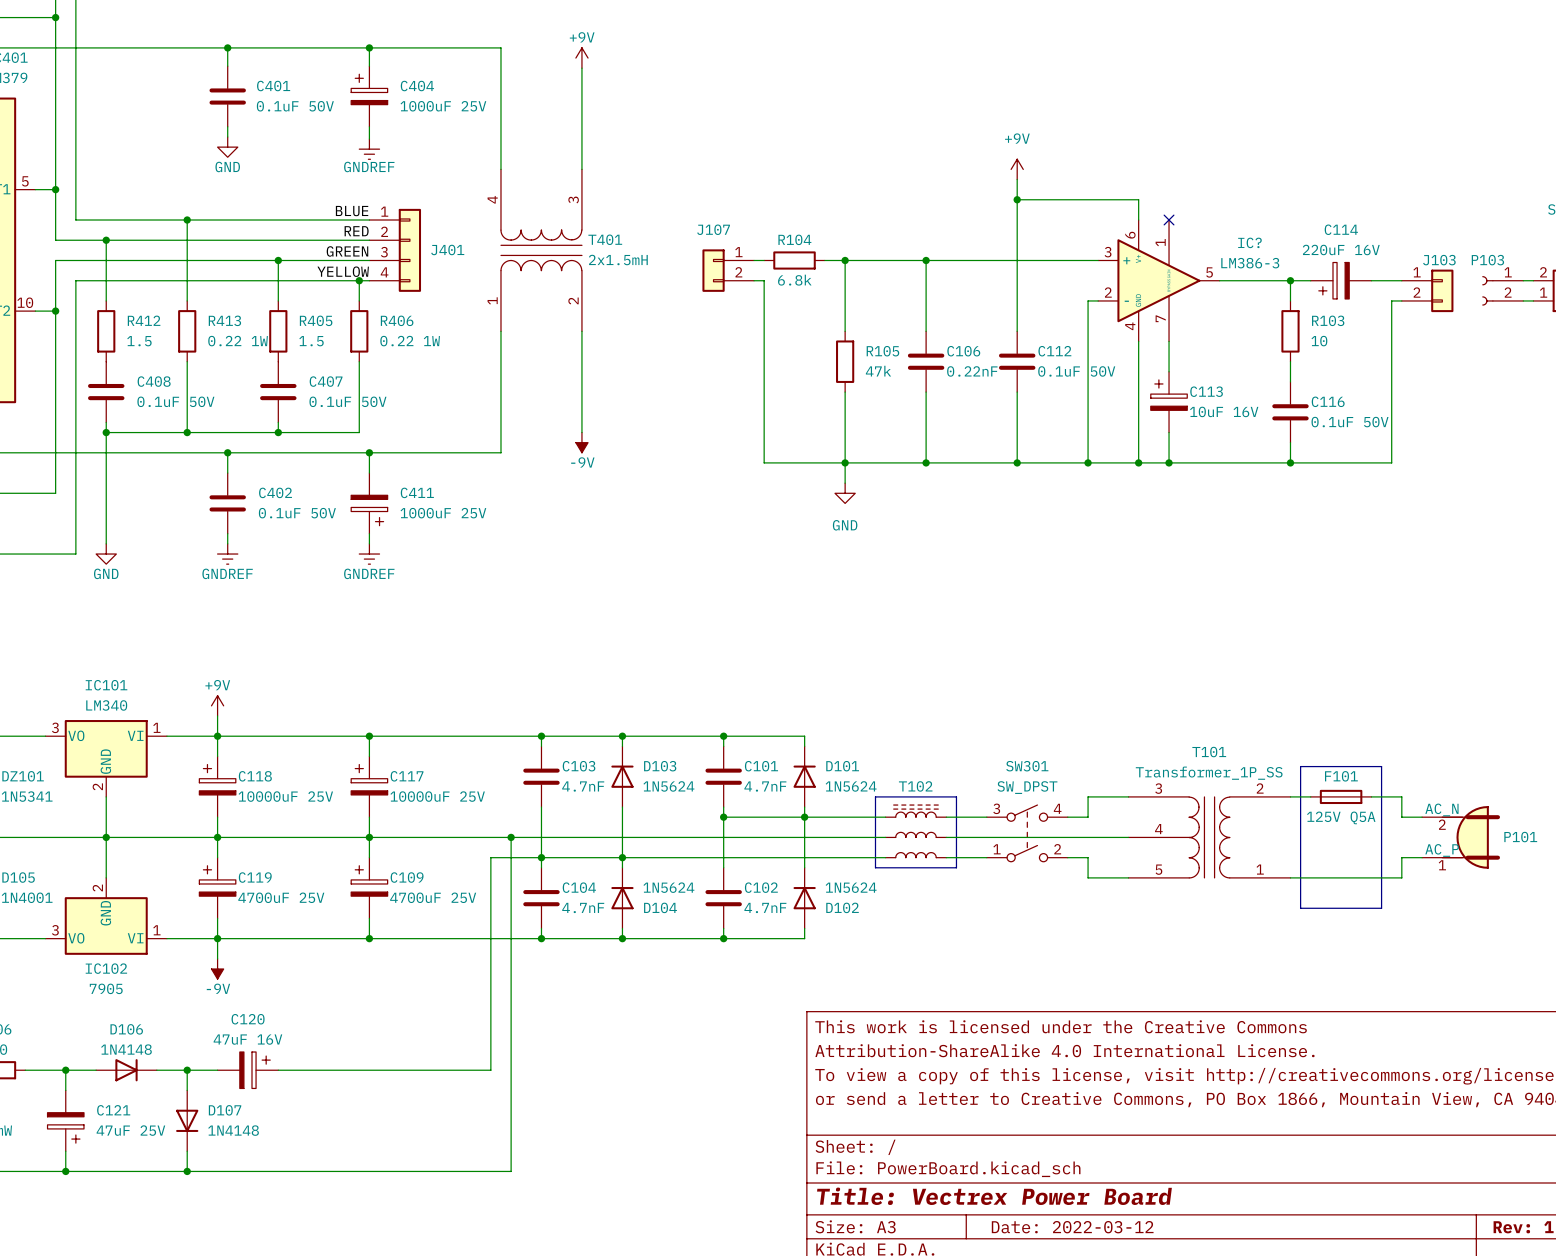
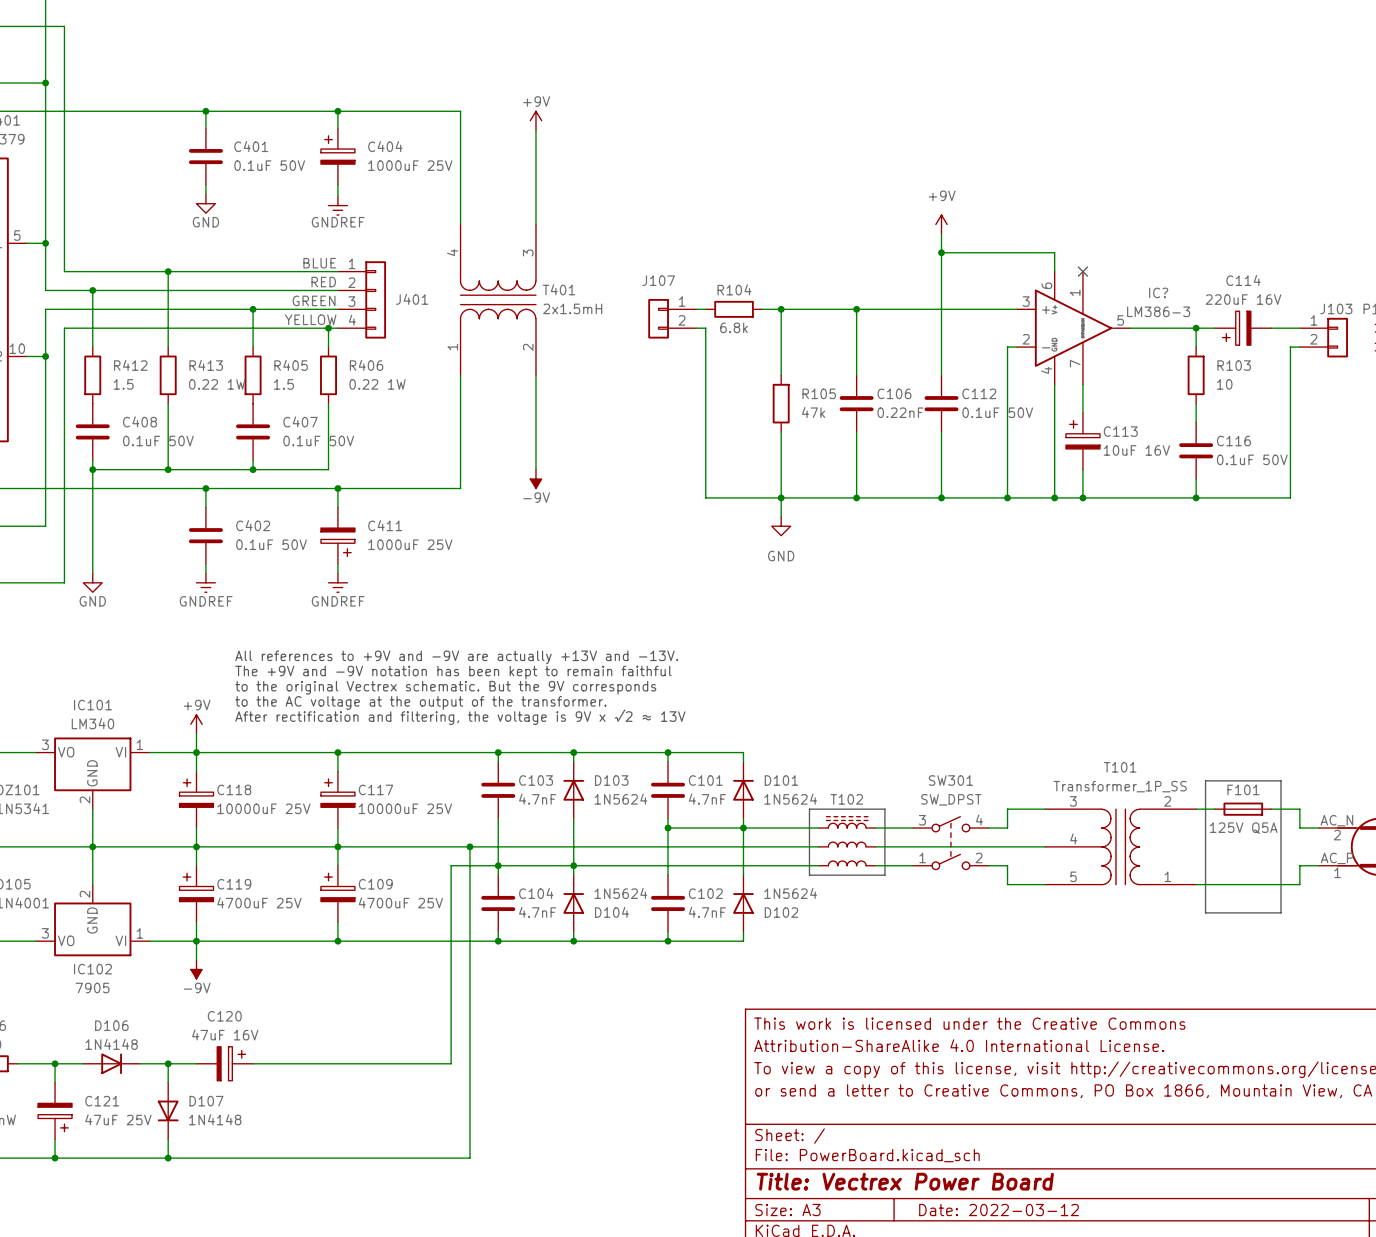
text: none -> All references to +9V and -9V are actually +13V and -13V. (456, 657)
text: none -> The +9V and -9V notation has been kept to remain faithful (453, 672)
text: none -> to the original Vectrex schematic. But the 9V corresponds (445, 687)
text: none -> to the AC voltage at the output of the transformer. (420, 702)
text: none -> After rectification and filtering, the voltage is 9V x √2 ≈ 13V (460, 717)

